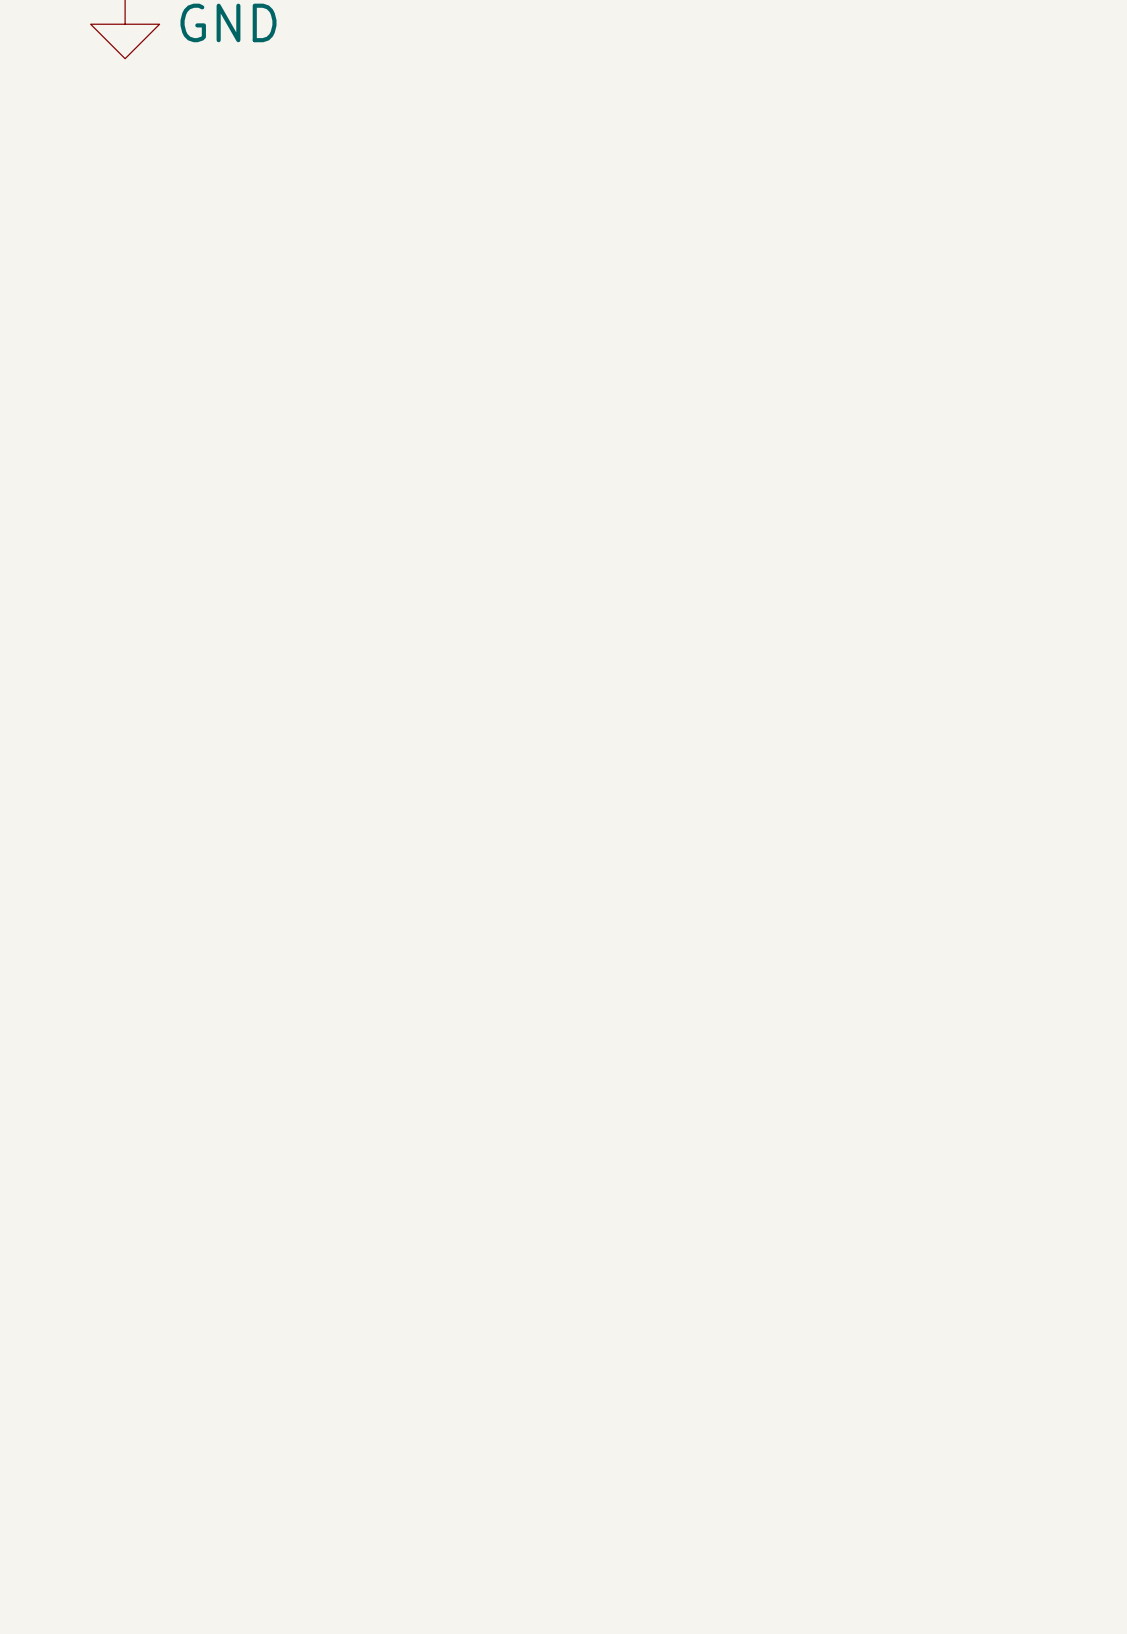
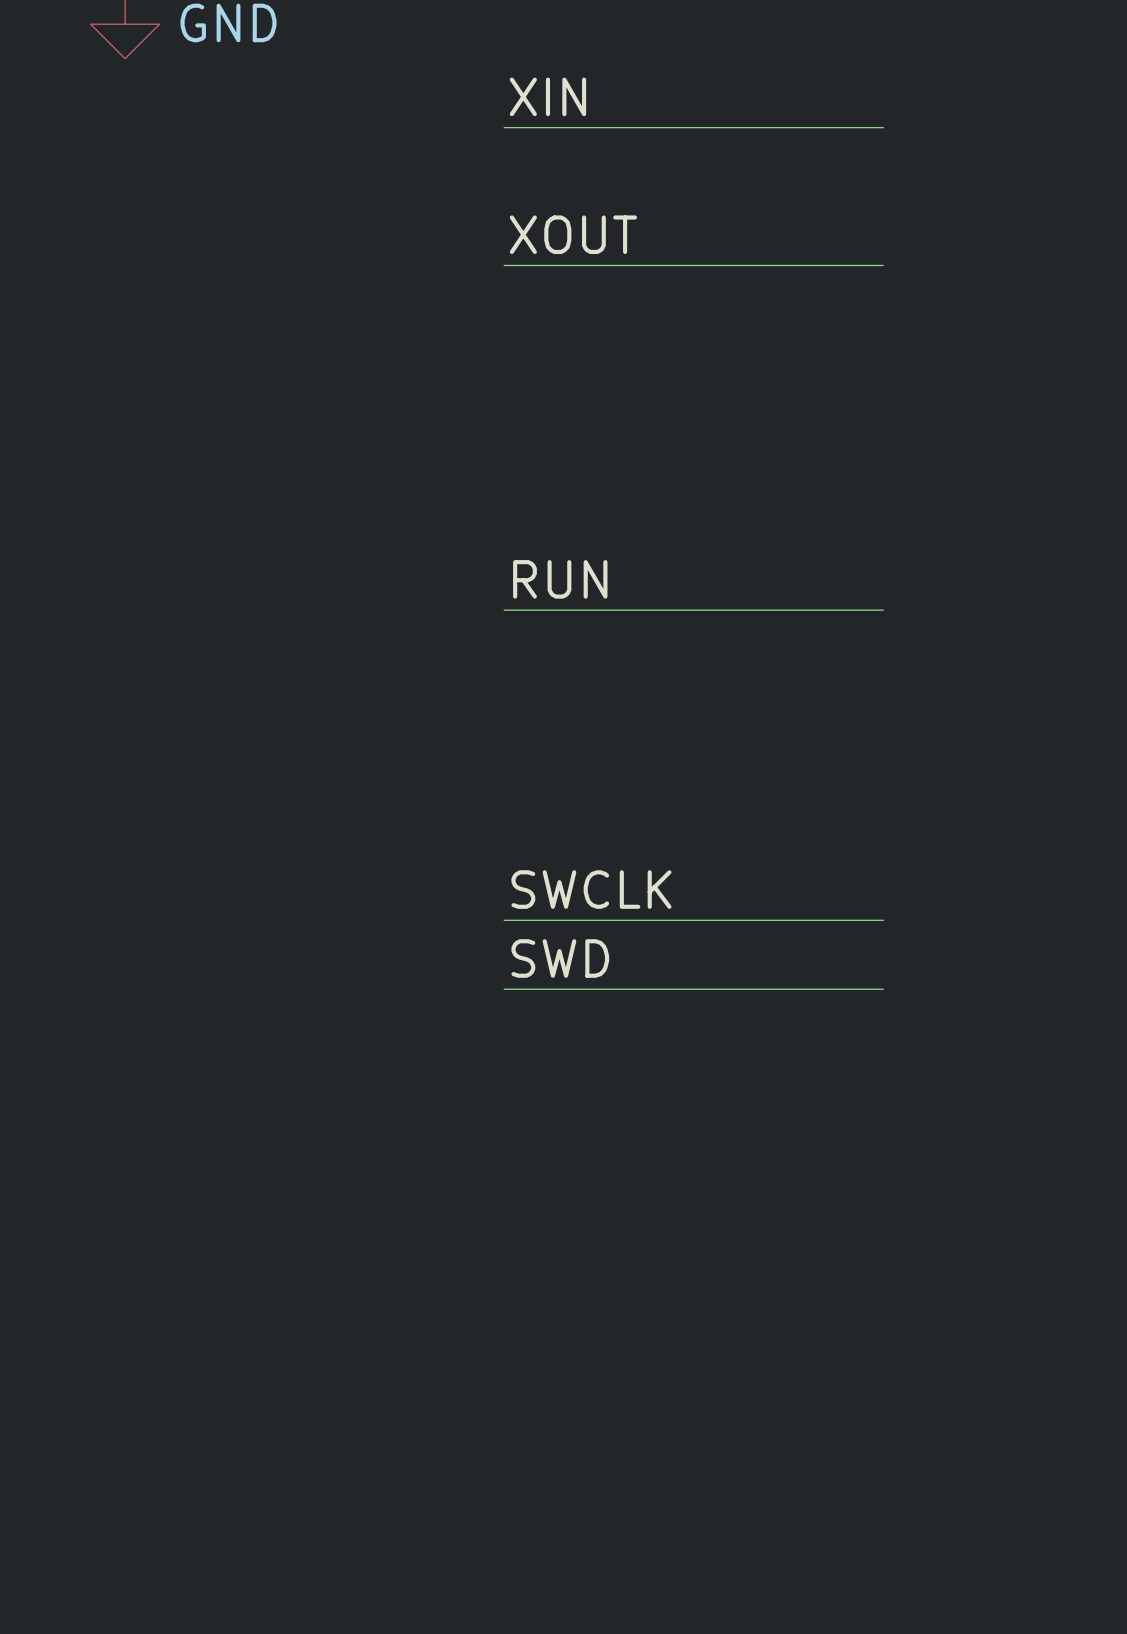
label: none -> XIN (547, 96)
wire: none -> (504, 127) (883, 127)
label: none -> XOUT (573, 234)
wire: none -> (504, 265) (883, 265)
label: none -> RUN (560, 579)
wire: none -> (504, 610) (883, 610)
label: none -> SWCLK (591, 889)
wire: none -> (504, 920) (883, 920)
label: none -> SWD (560, 958)
wire: none -> (504, 989) (883, 989)

